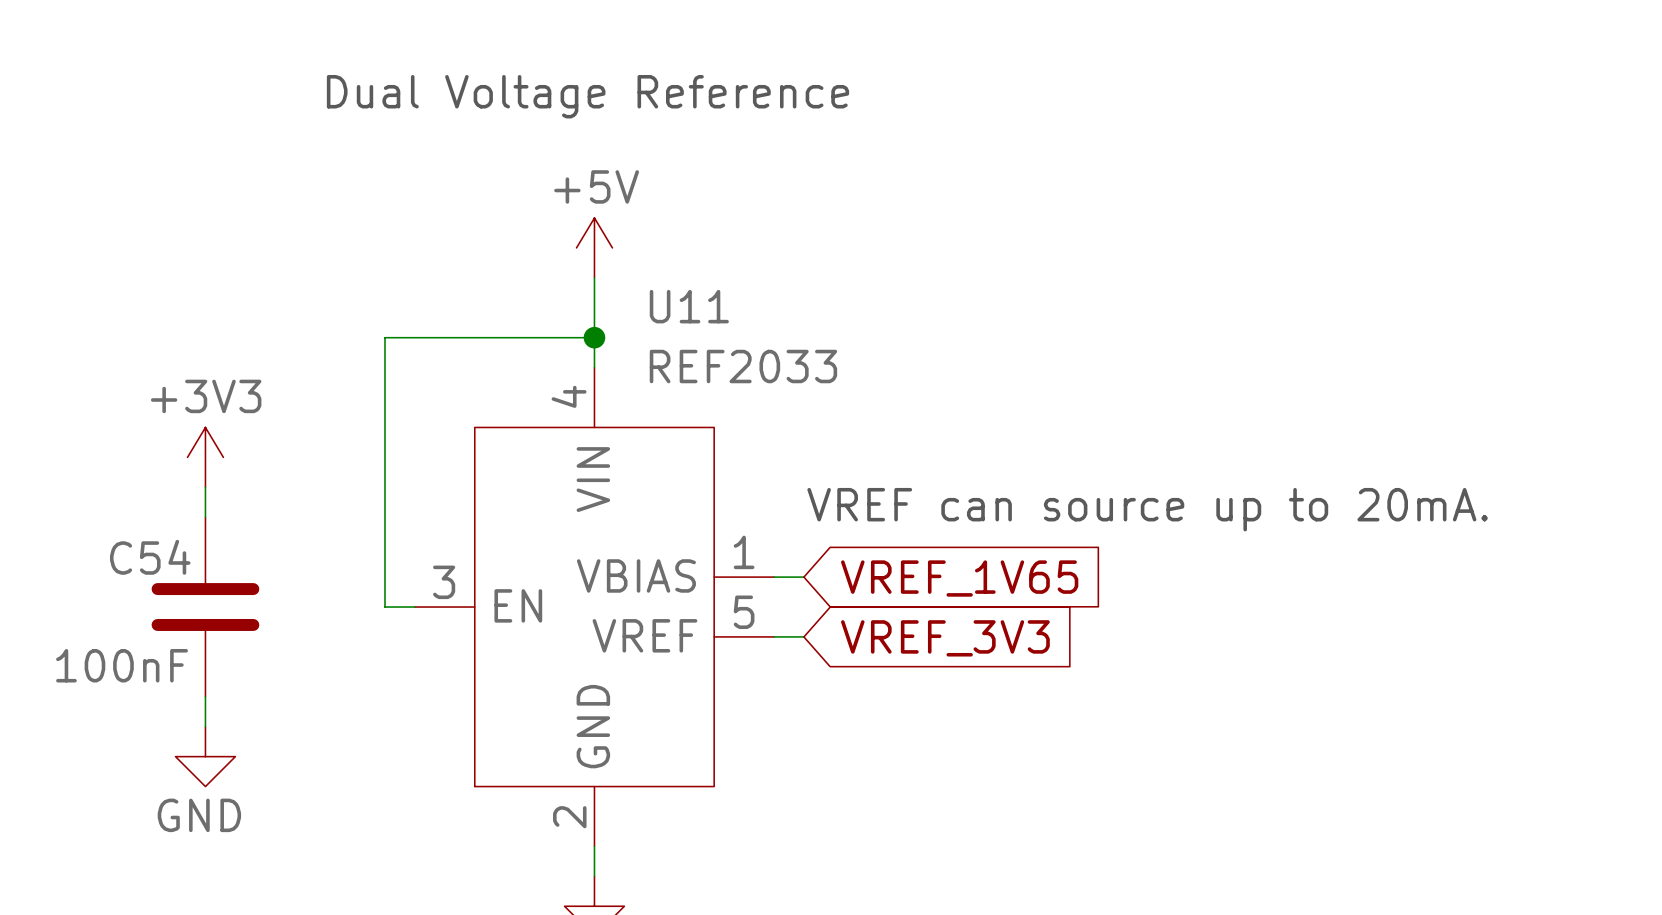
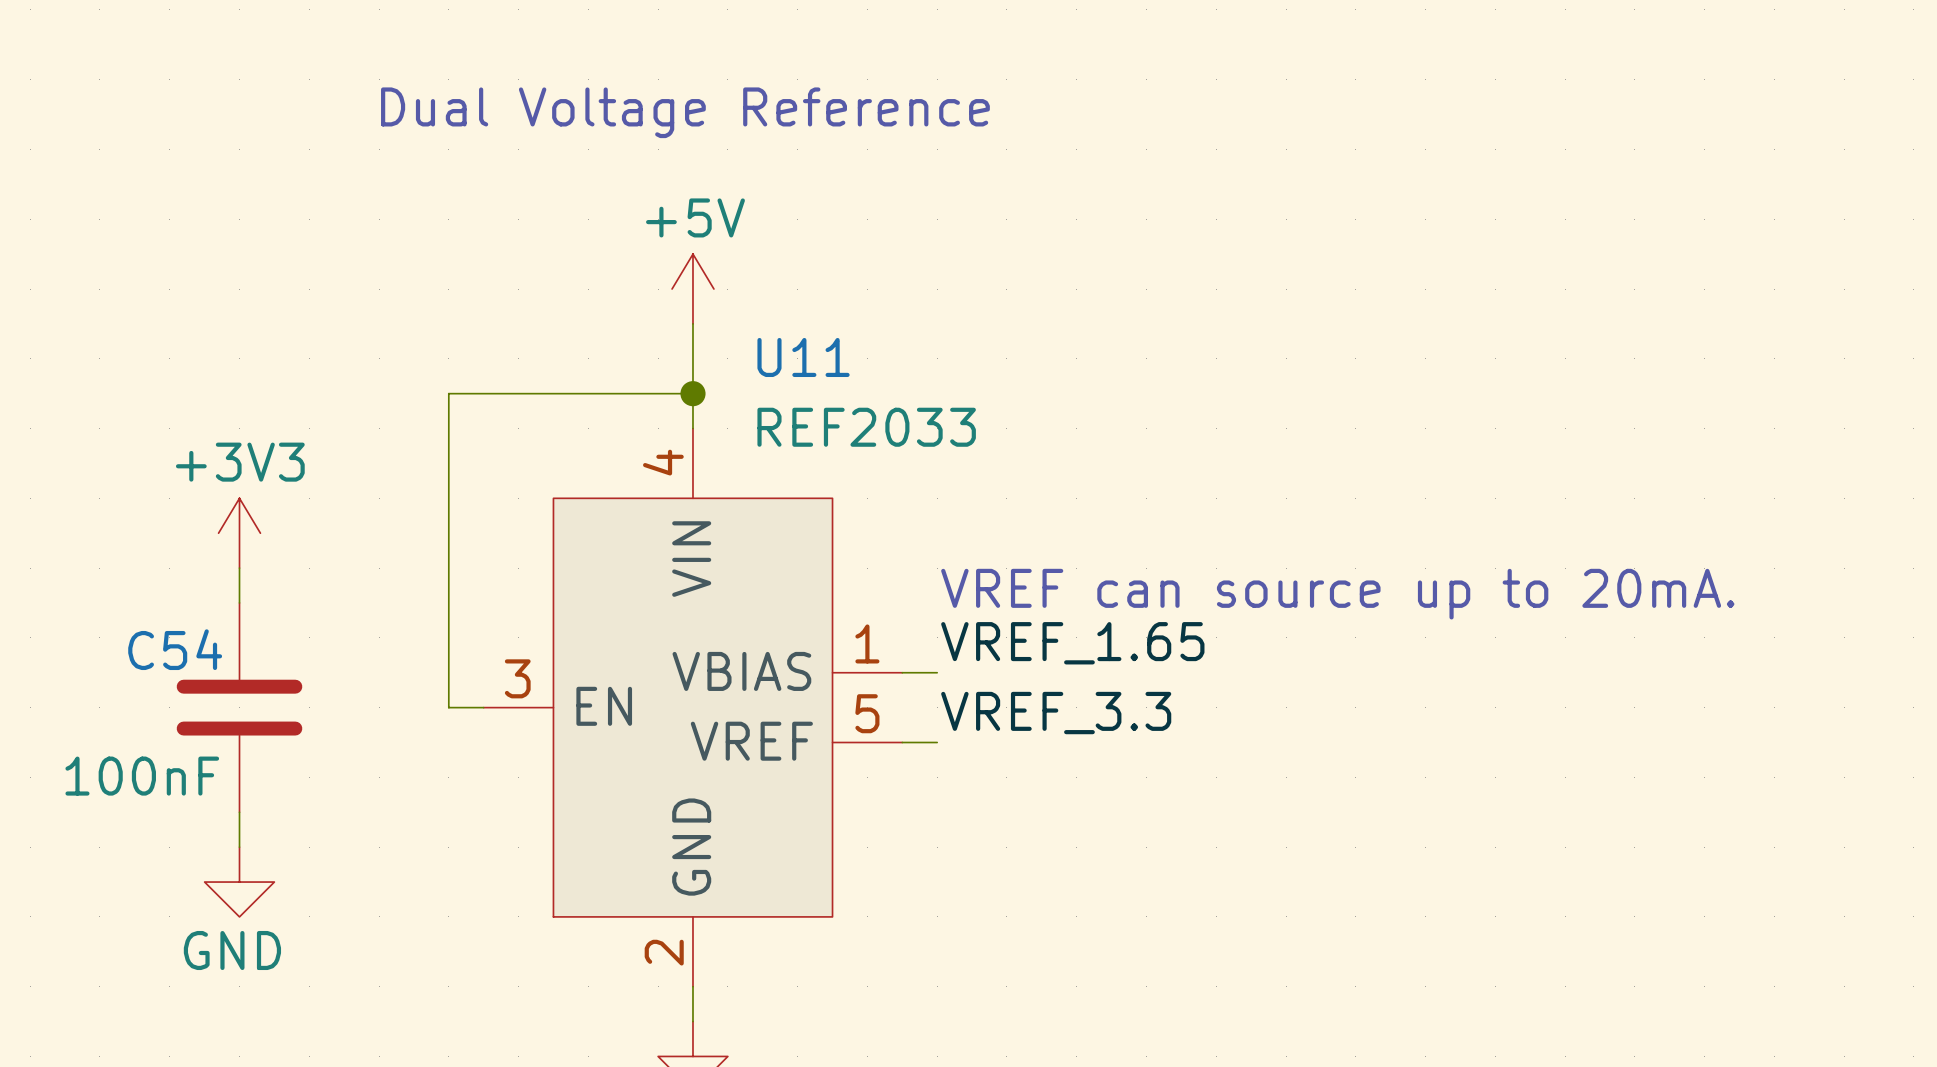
label: none -> VREF_1.65 (1072, 643)
global label: VREF_1V65 (959, 578) -> none
label: none -> VREF_3.3 (1056, 713)
global label: VREF_3V3 (945, 638) -> none

